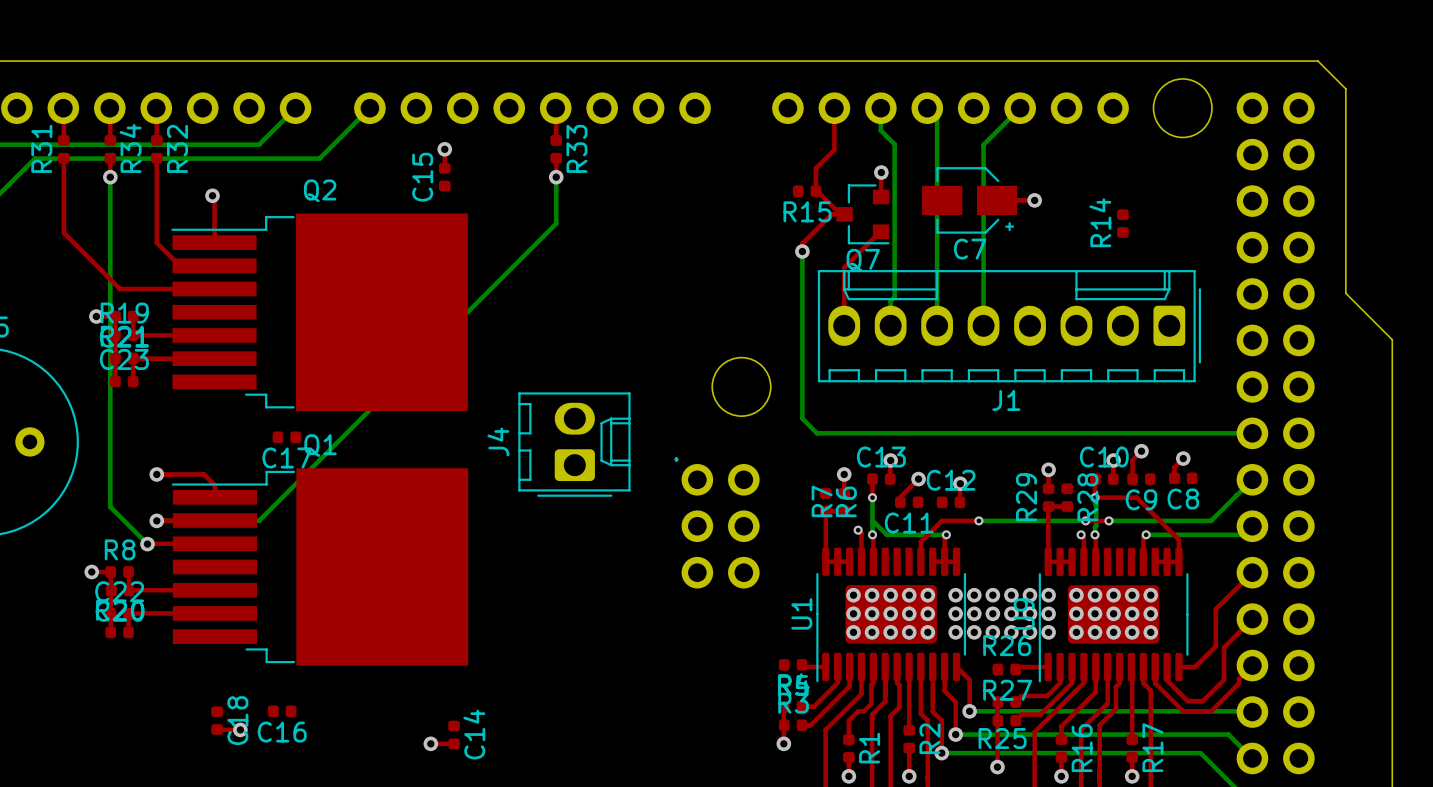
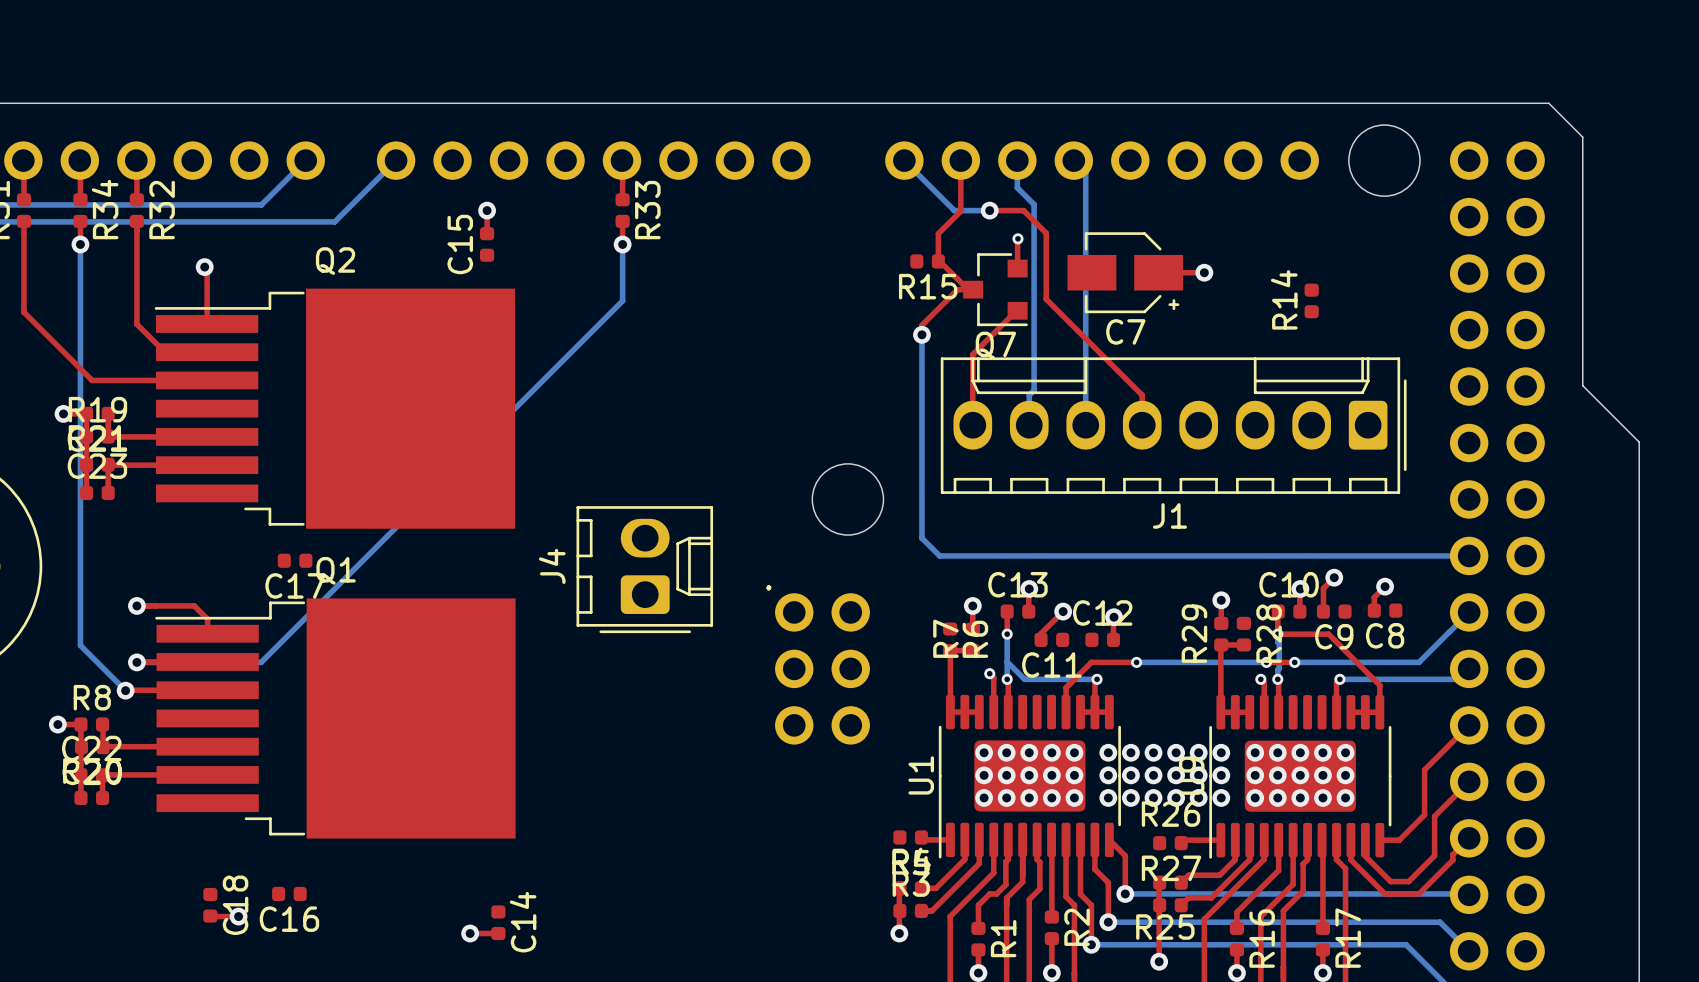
bottom track: none -> (904, 160) (954, 210) (989, 210)
bottom track: (1020, 108) (983, 144) (983, 321) -> none
top track: none -> (989, 210) (1023, 210) (1046, 233) (1046, 299) (1142, 395) (1142, 425)
via position: (881, 172) -> (989, 210)
via: none -> (1017, 238)

